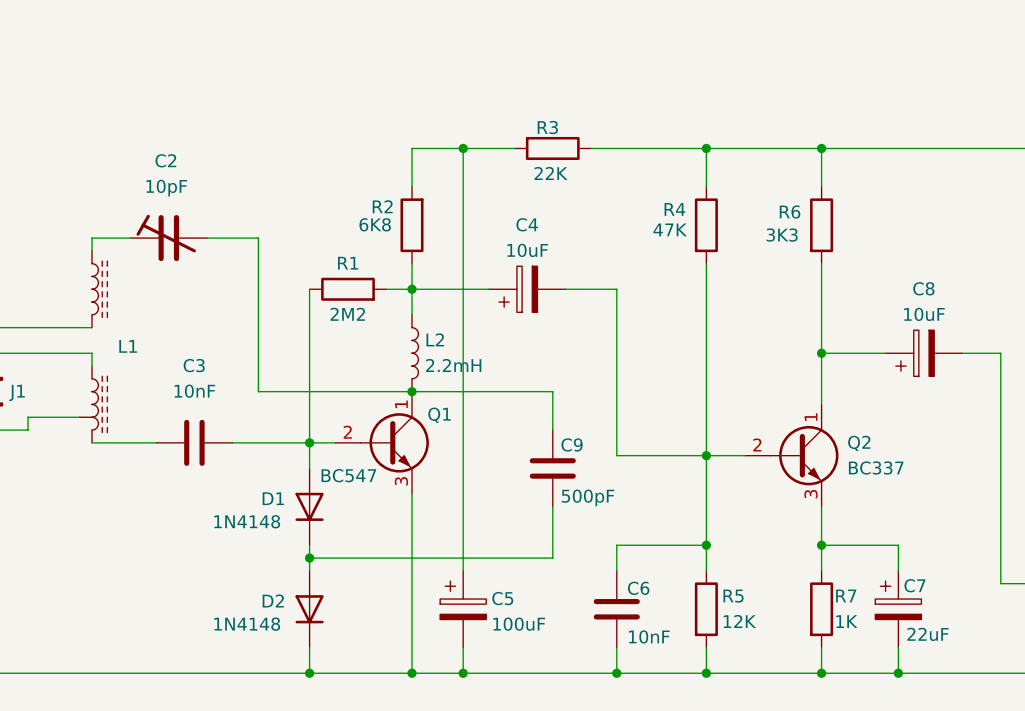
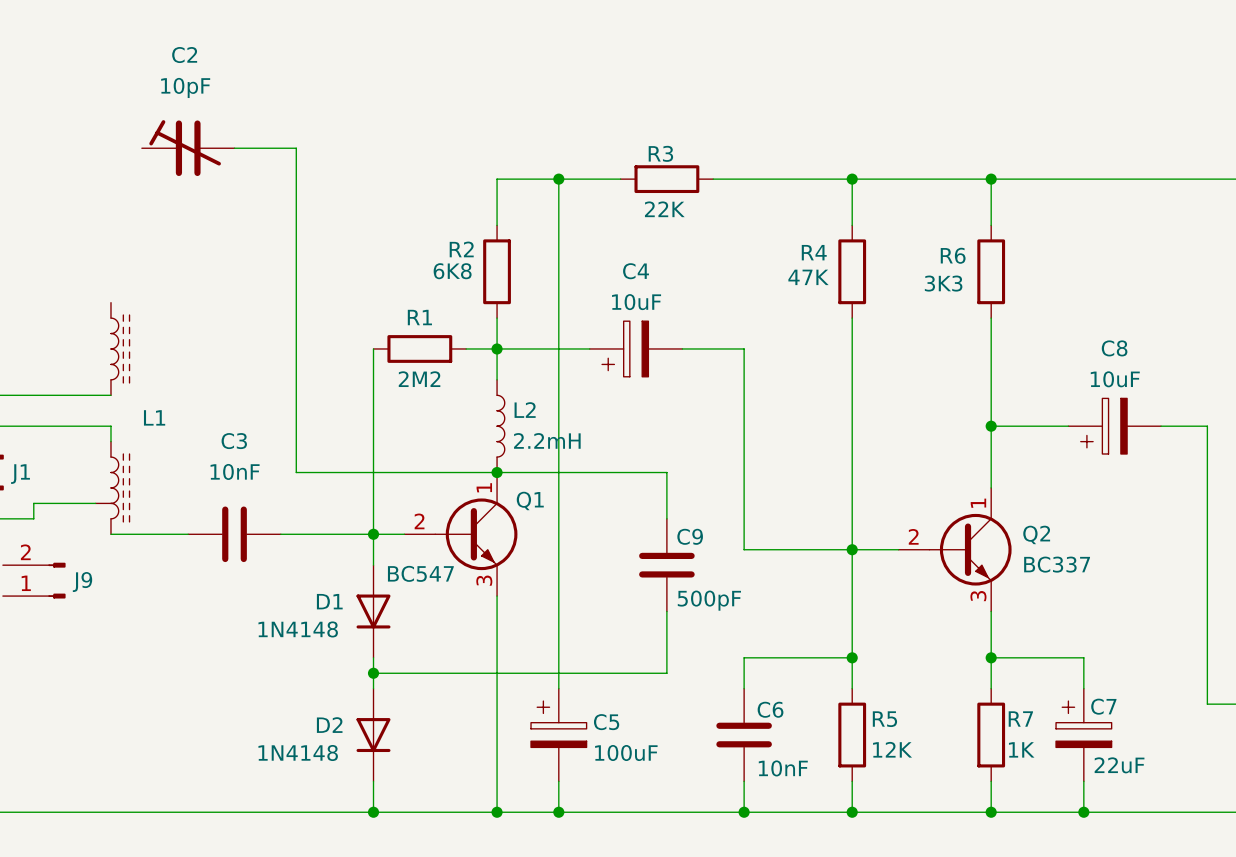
C2 position: (168, 237) -> (188, 148)
wire: (130, 238) (92, 238) (92, 250) -> none
wire: (207, 238) (258, 238) (258, 391) -> (234, 148) (296, 148) (296, 472) (311, 472)
J9: none -> (34, 580)

